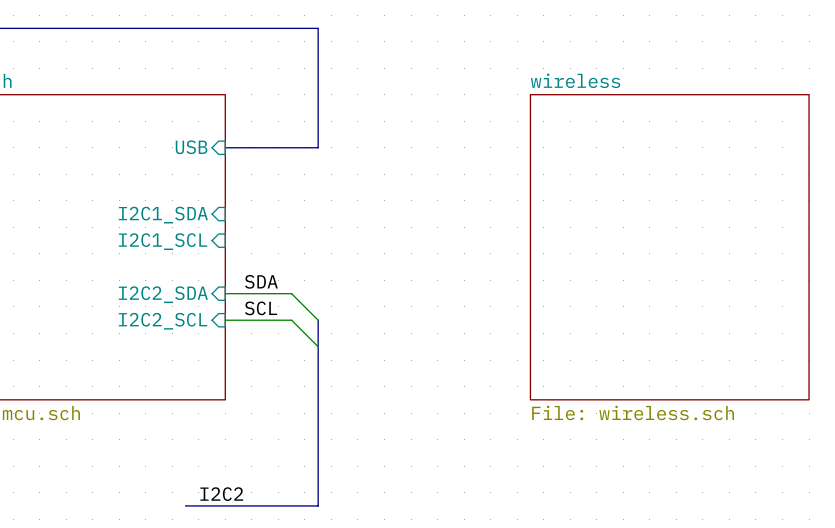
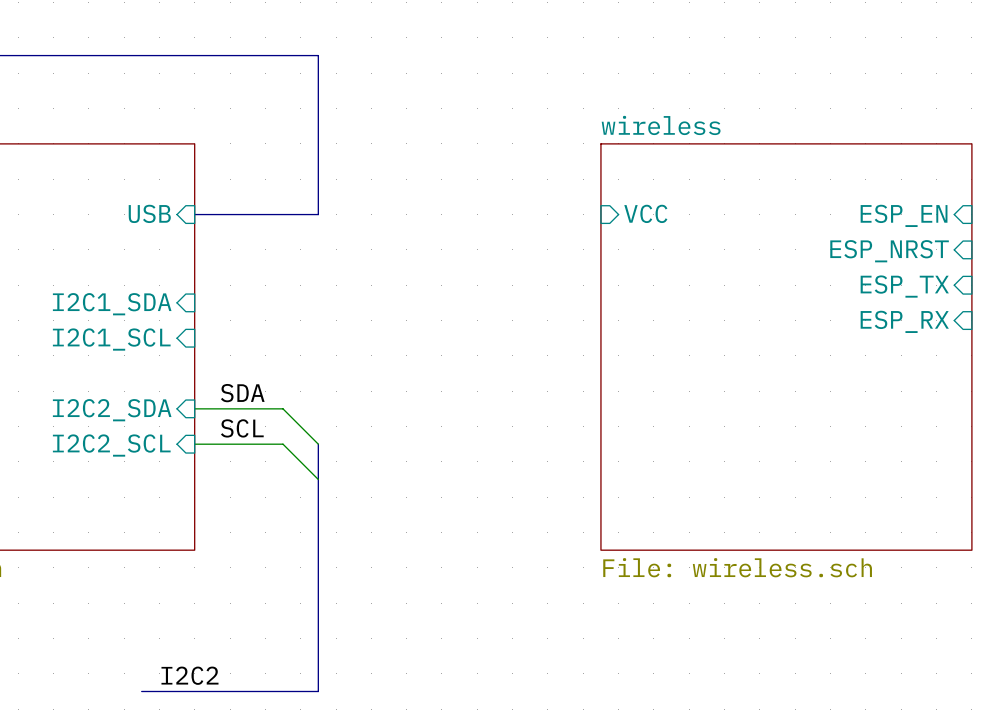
sheet pin: none -> VCC (645, 213)
sheet pin: none -> ESP_EN (904, 215)
sheet pin: none -> ESP_NRST (889, 251)
sheet pin: none -> ESP_TX (904, 286)
sheet pin: none -> ESP_RX (904, 321)

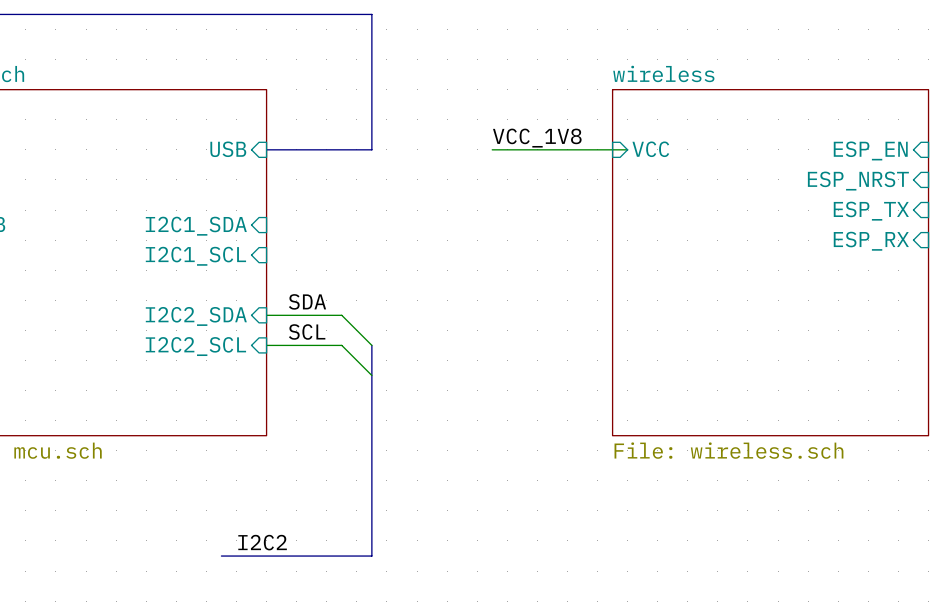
label: none -> VCC_1V8 (537, 138)
wire: none -> (492, 149) (627, 149)

